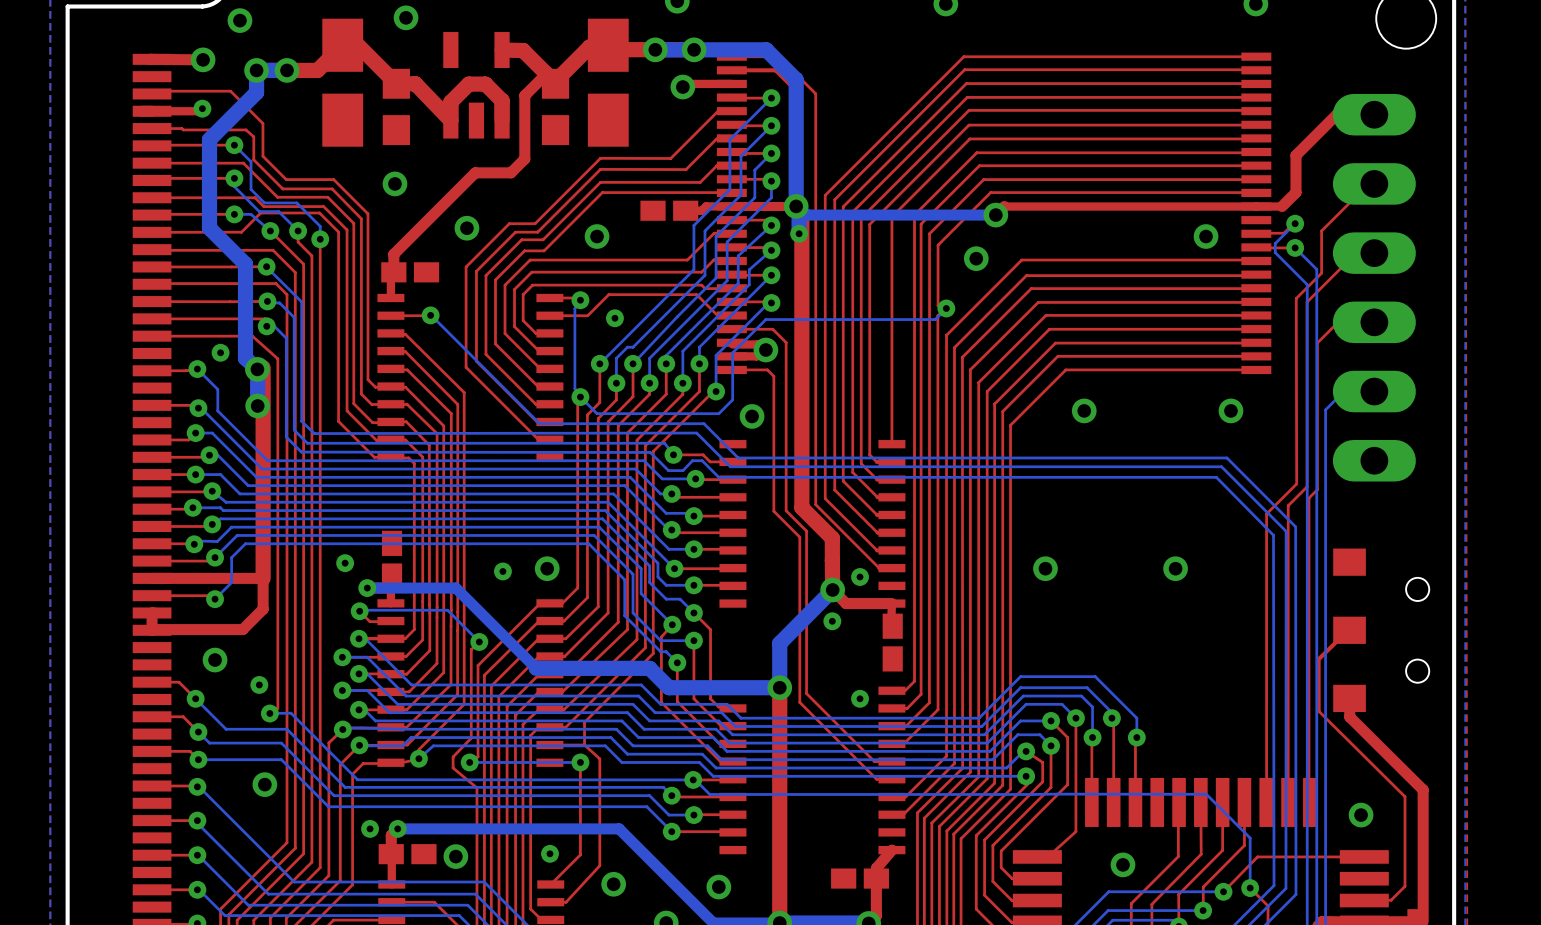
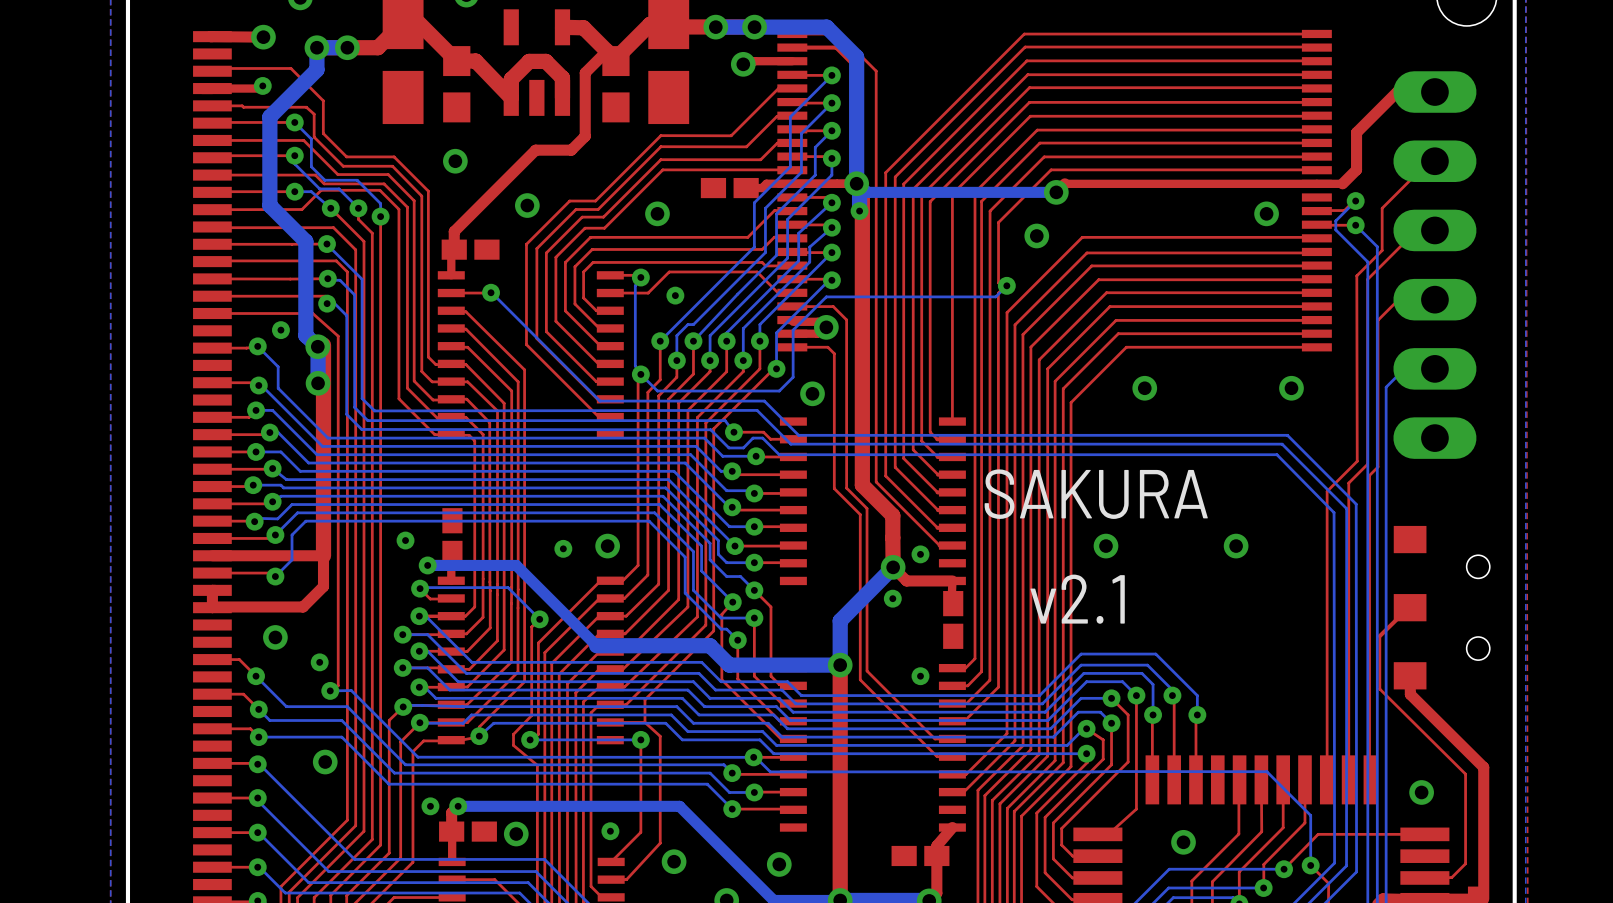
text: none -> SAKURA (1096, 494)
text: none -> v2.1 (1077, 599)

